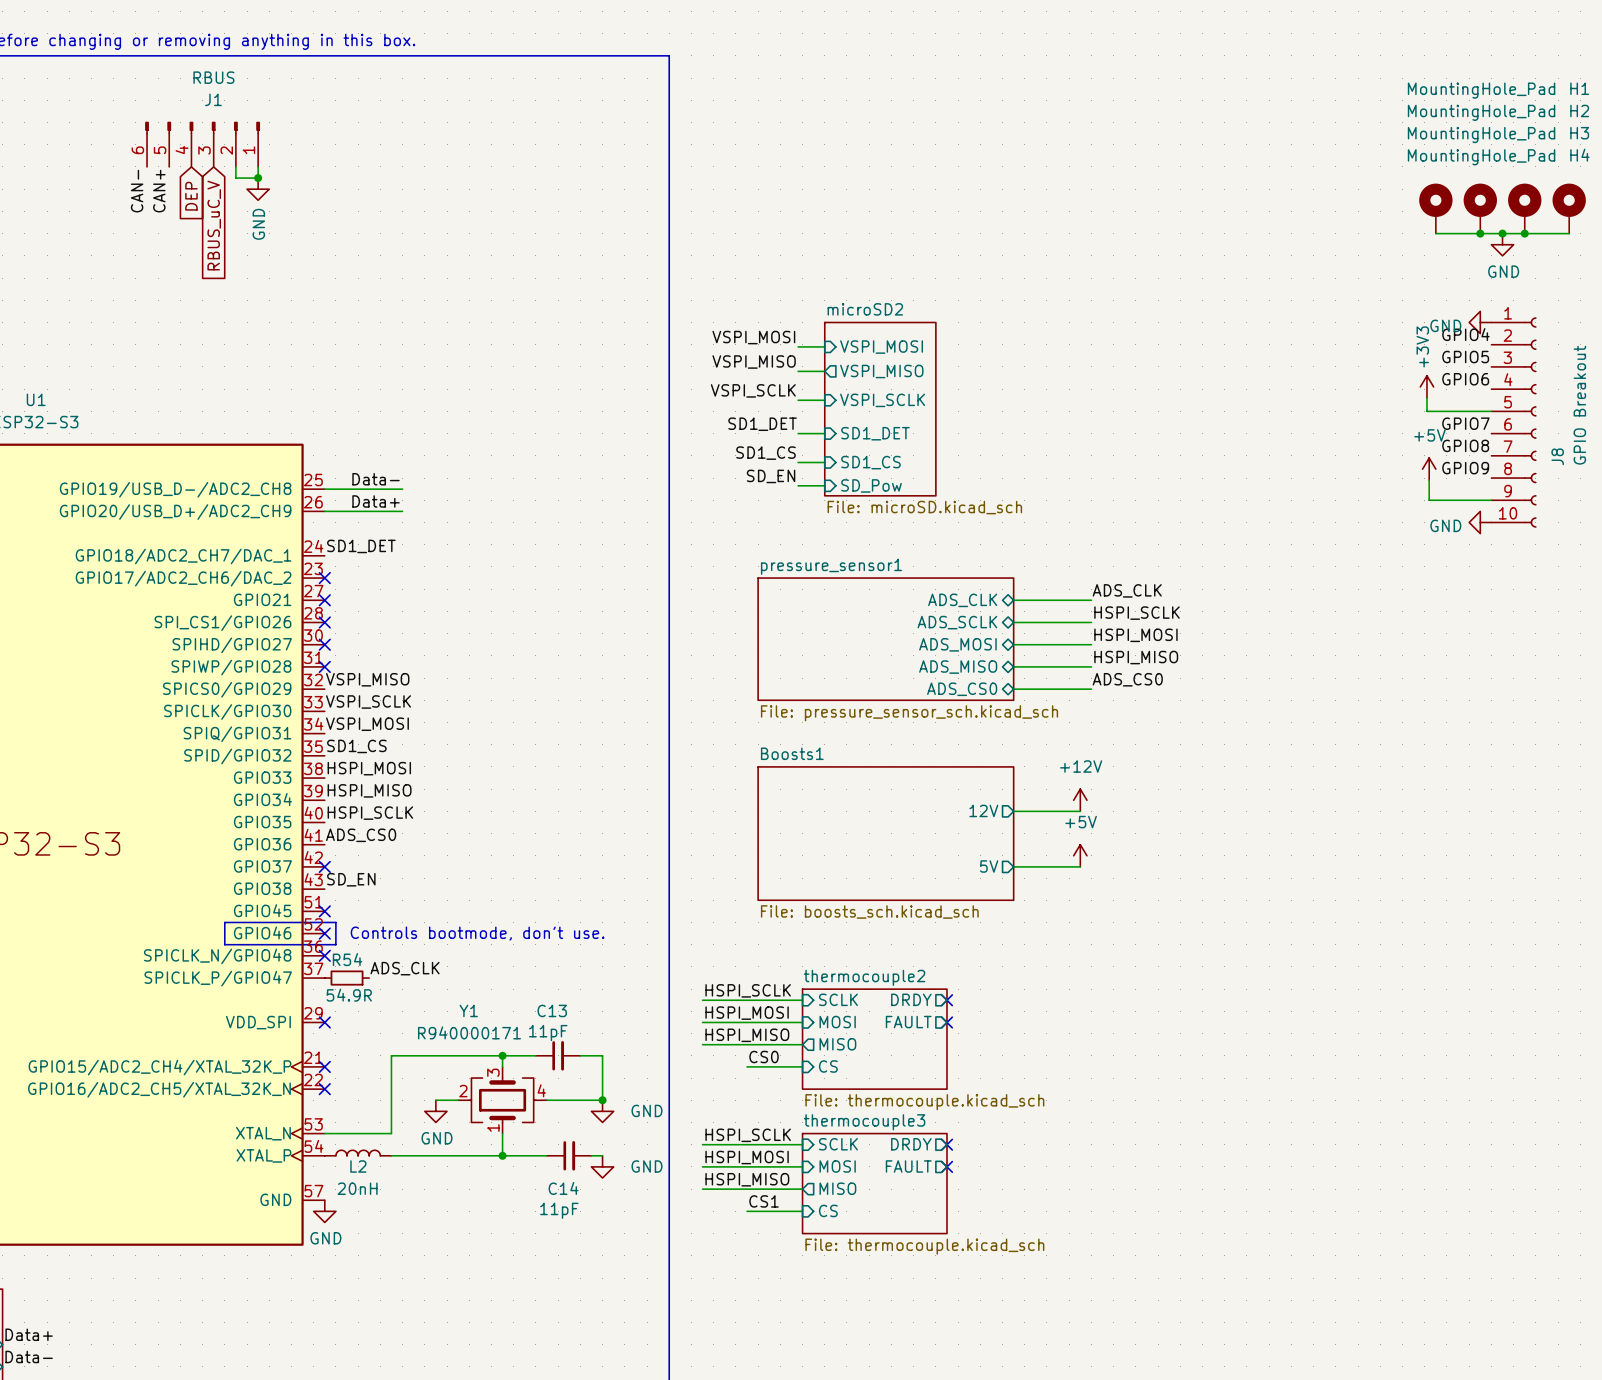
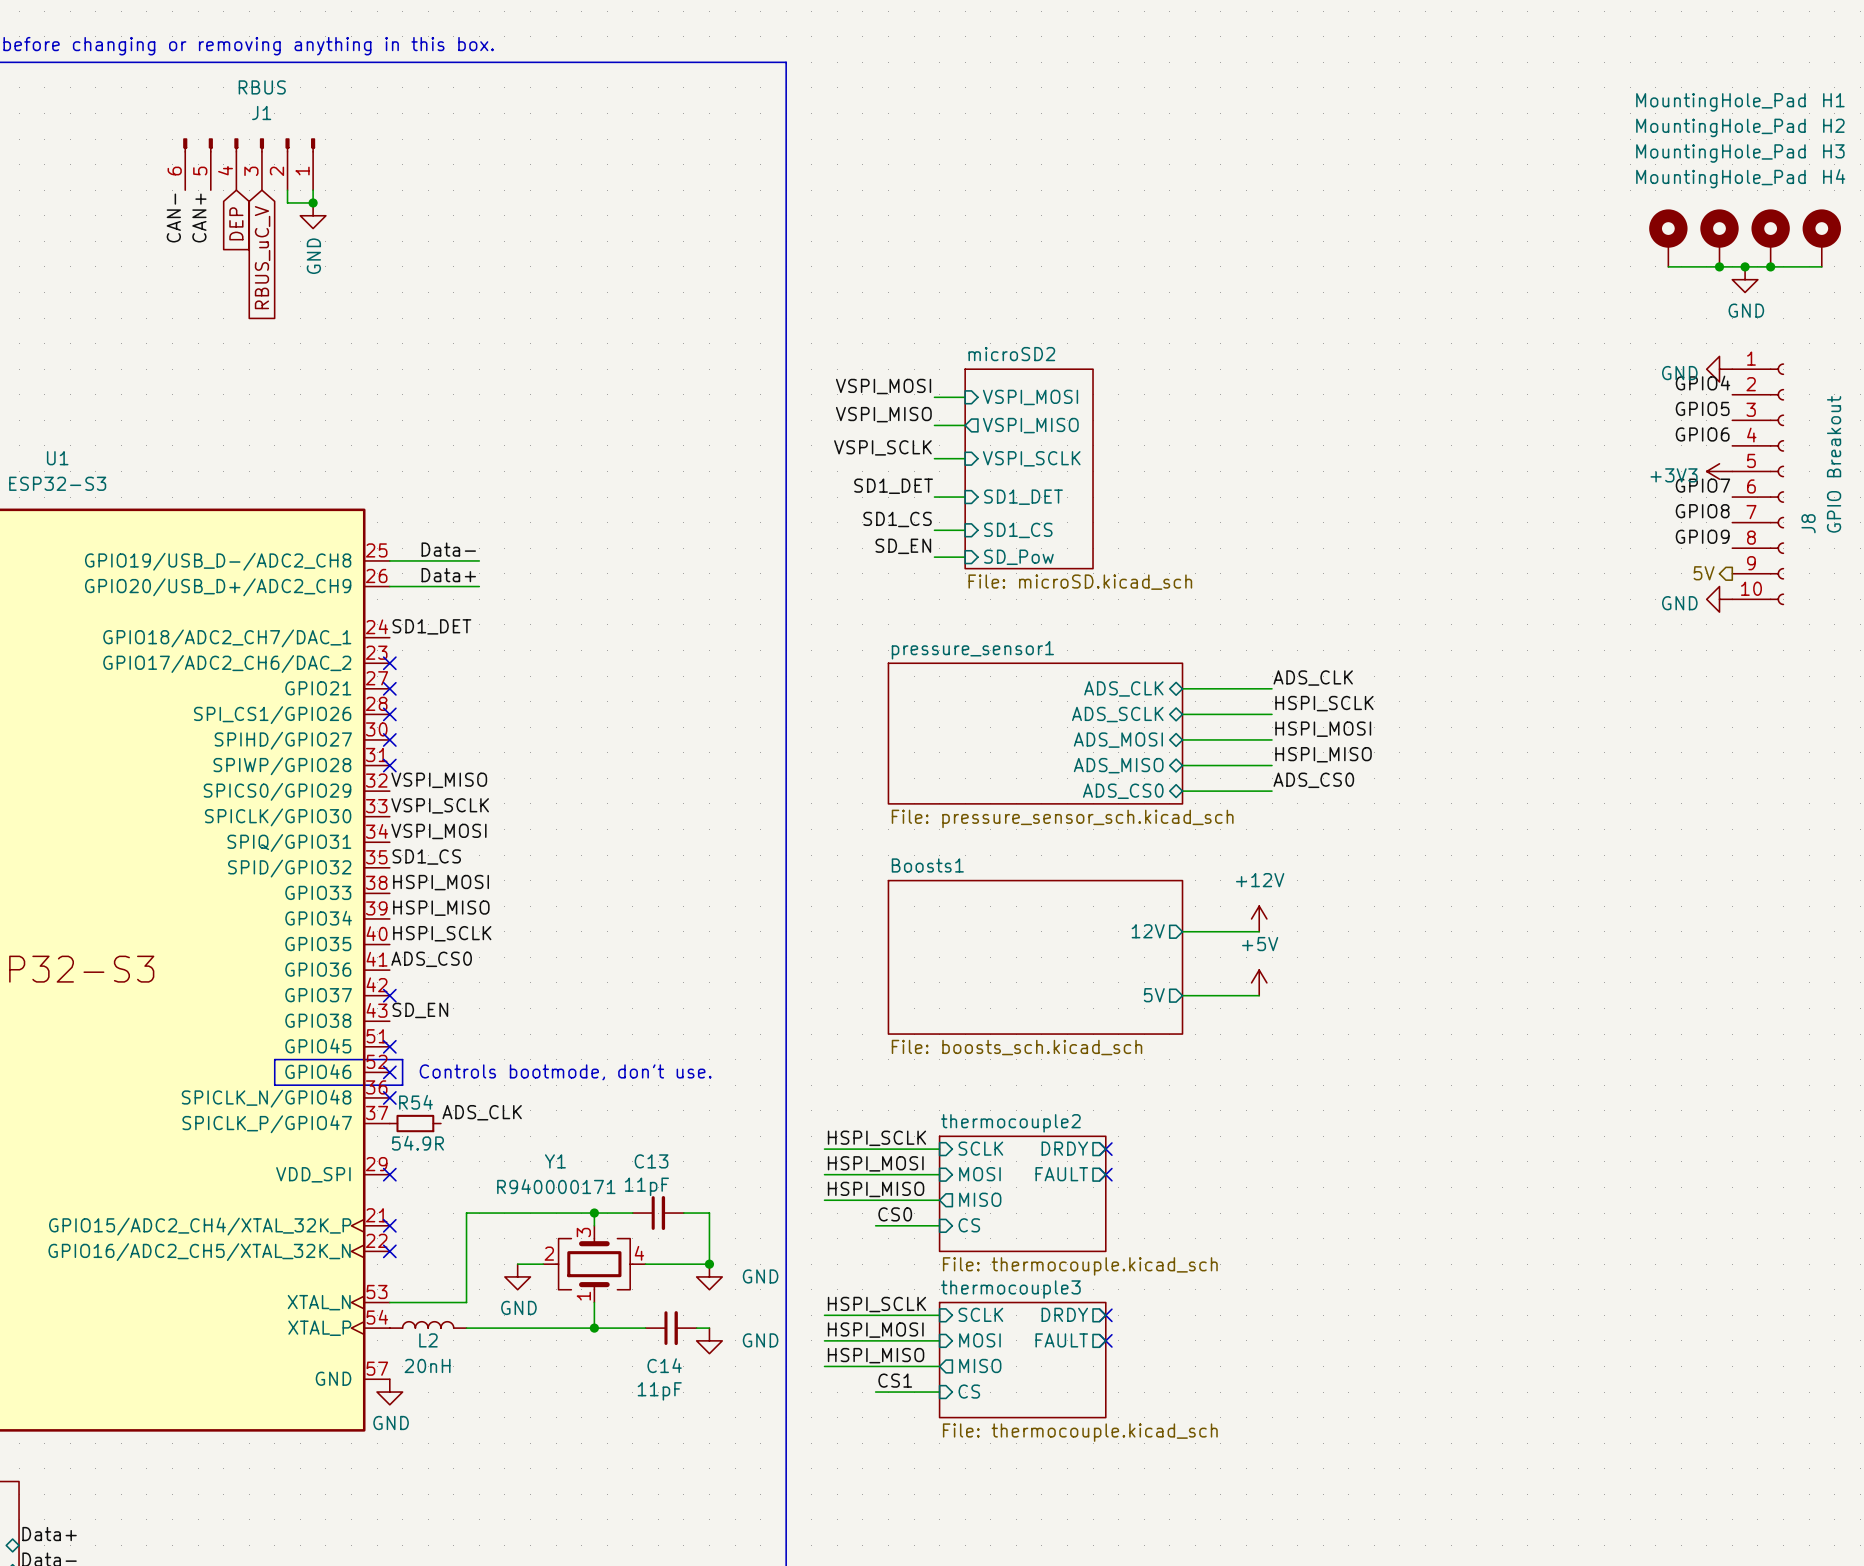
power symbol rotation: 0° (1426, 386) -> 90° counterclockwise (1719, 471)
power symbol position: +3V3 (1426, 386) -> +3V3 (1719, 471)
wire: (1426, 398) (1426, 411) (1491, 411) -> none
power symbol: +5V (1429, 469) -> none
wire: (1429, 480) (1429, 500) (1491, 500) -> none
hierarchical label: none -> 5V (1704, 573)

